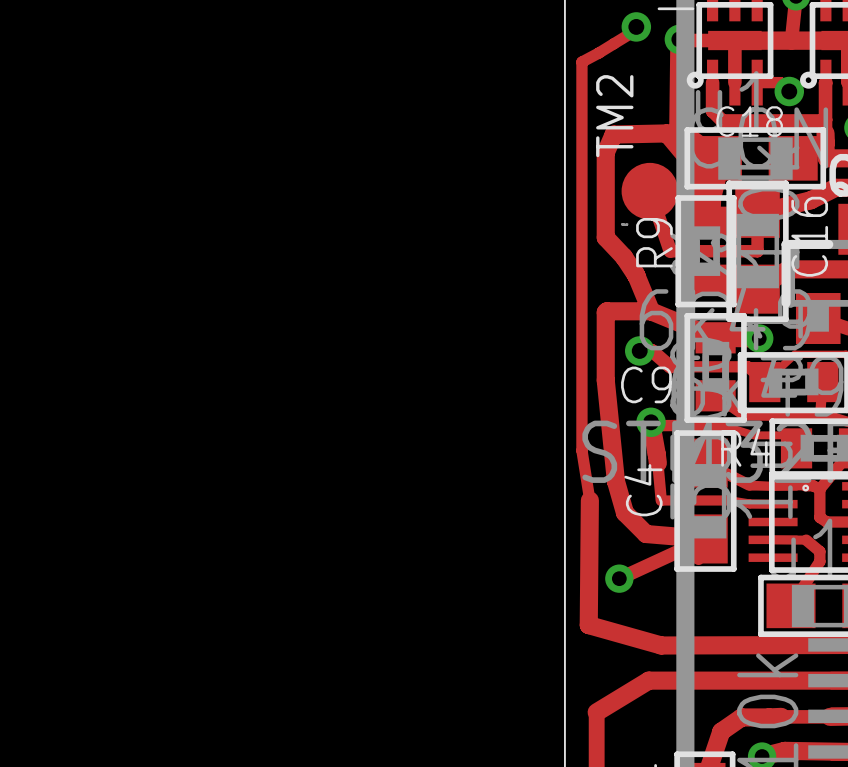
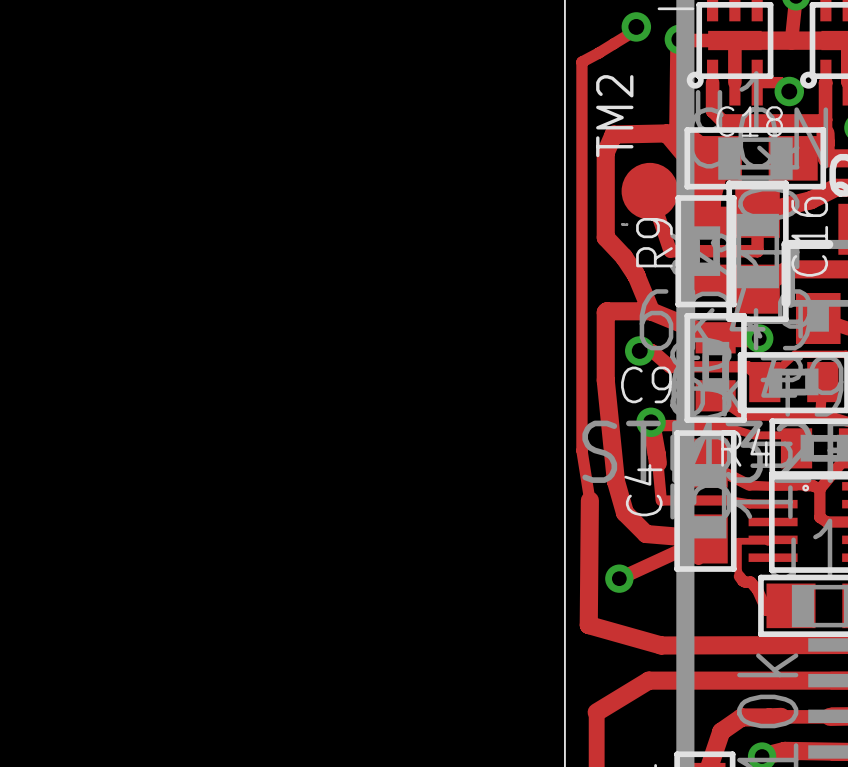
track: (773, 539) (806, 540) (819, 551) (819, 561) (791, 605) -> (773, 539) (738, 541) (739, 576) (745, 582) (750, 582) (757, 589) (766, 610) (772, 605) (791, 605)

